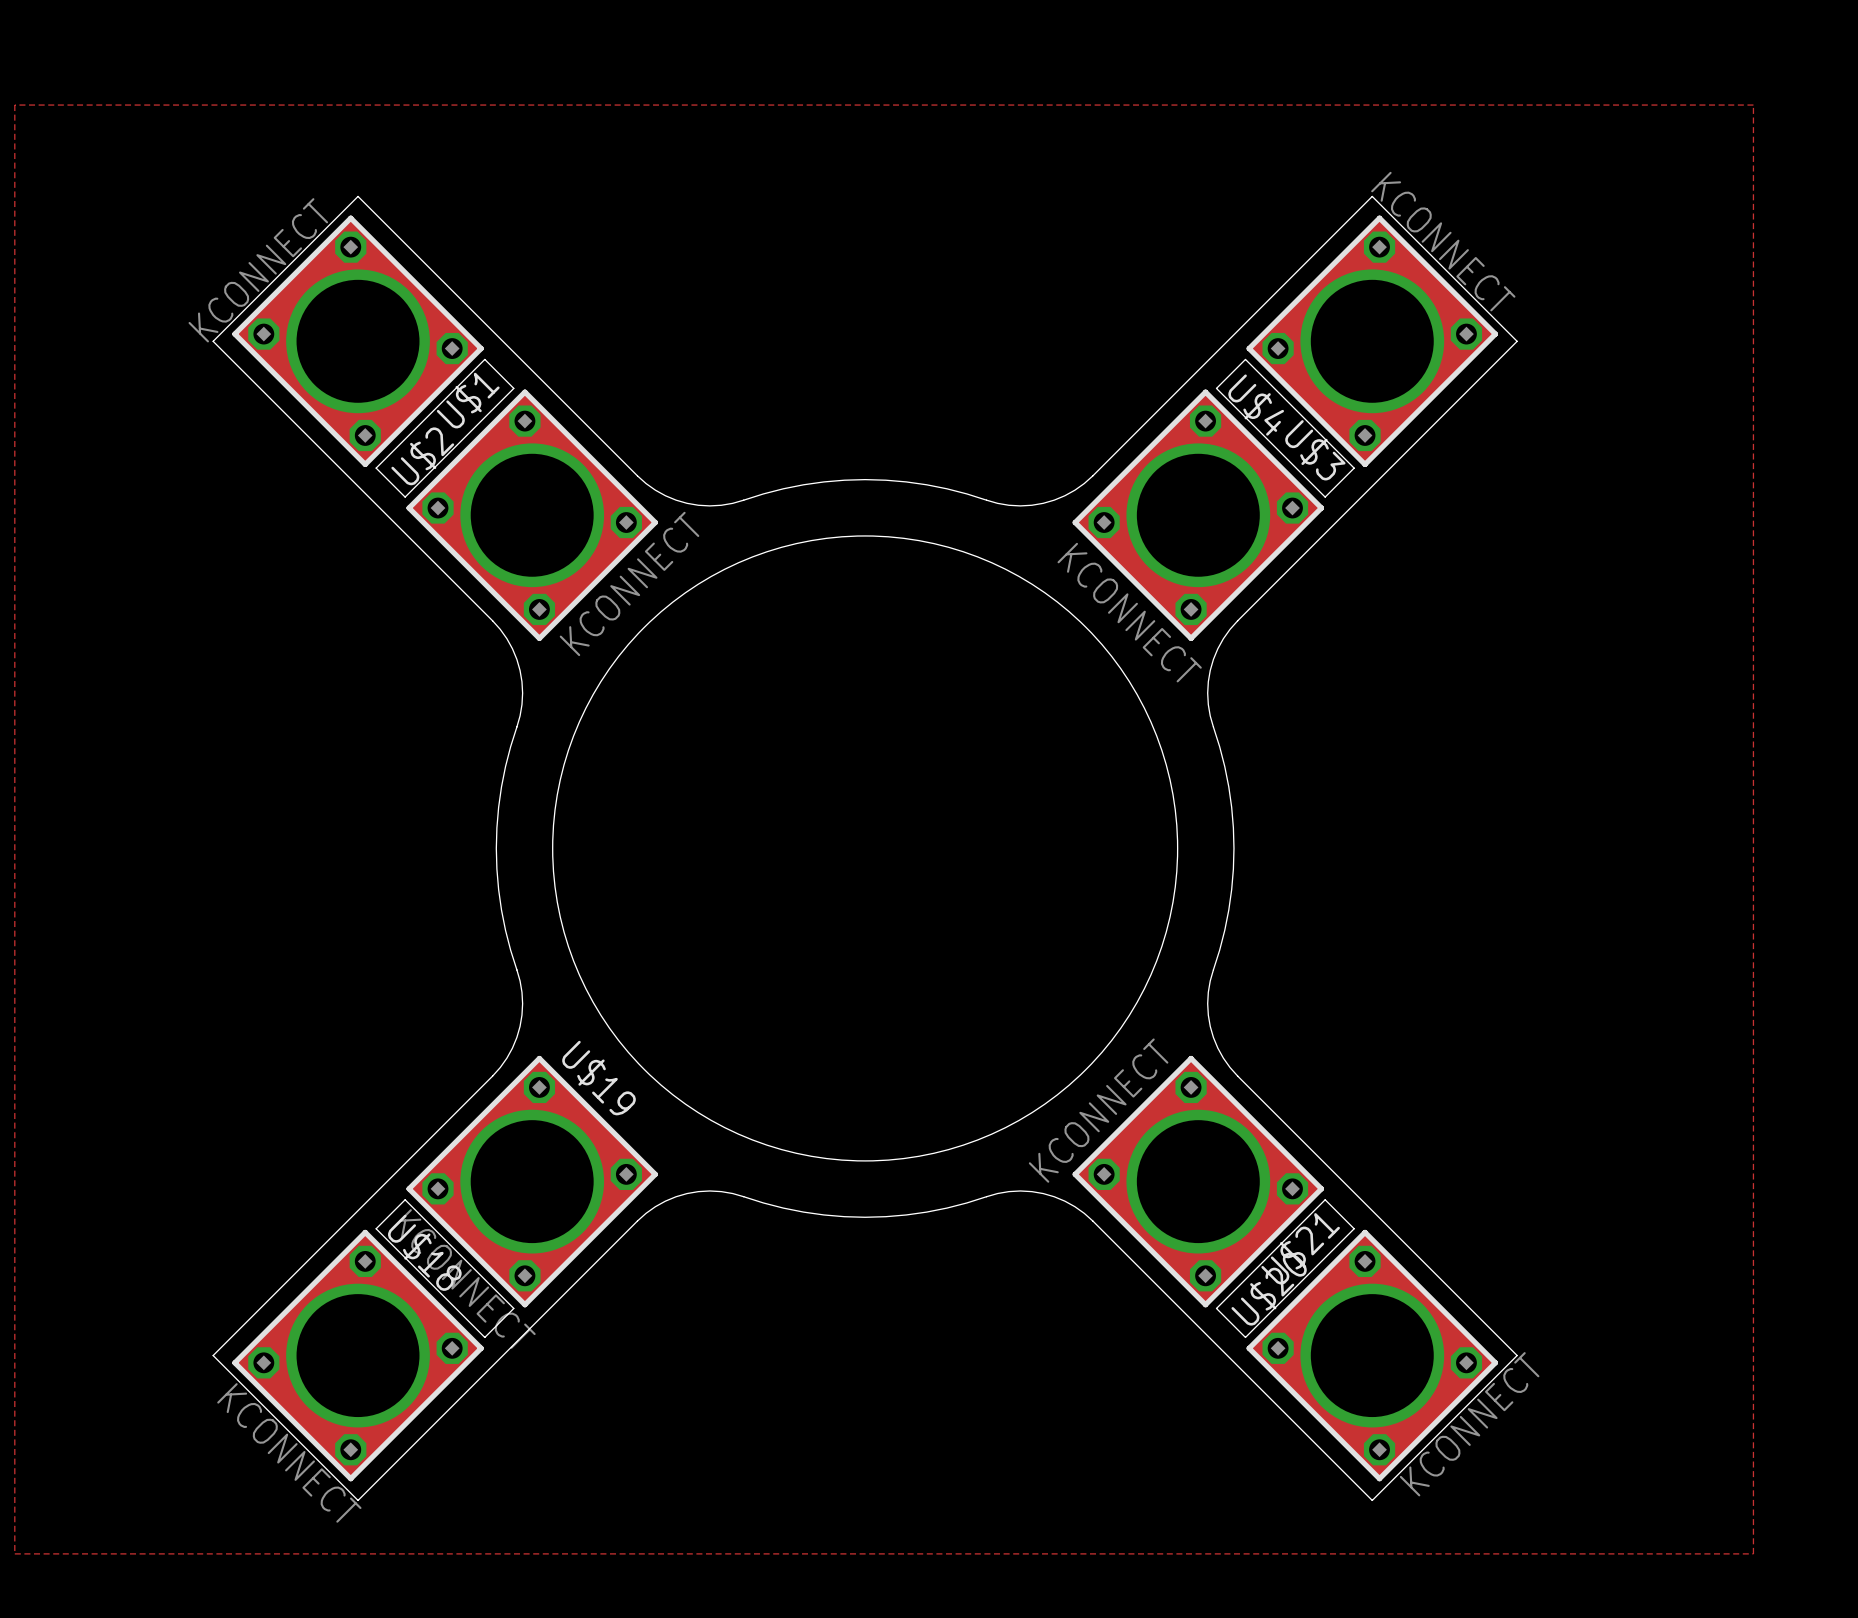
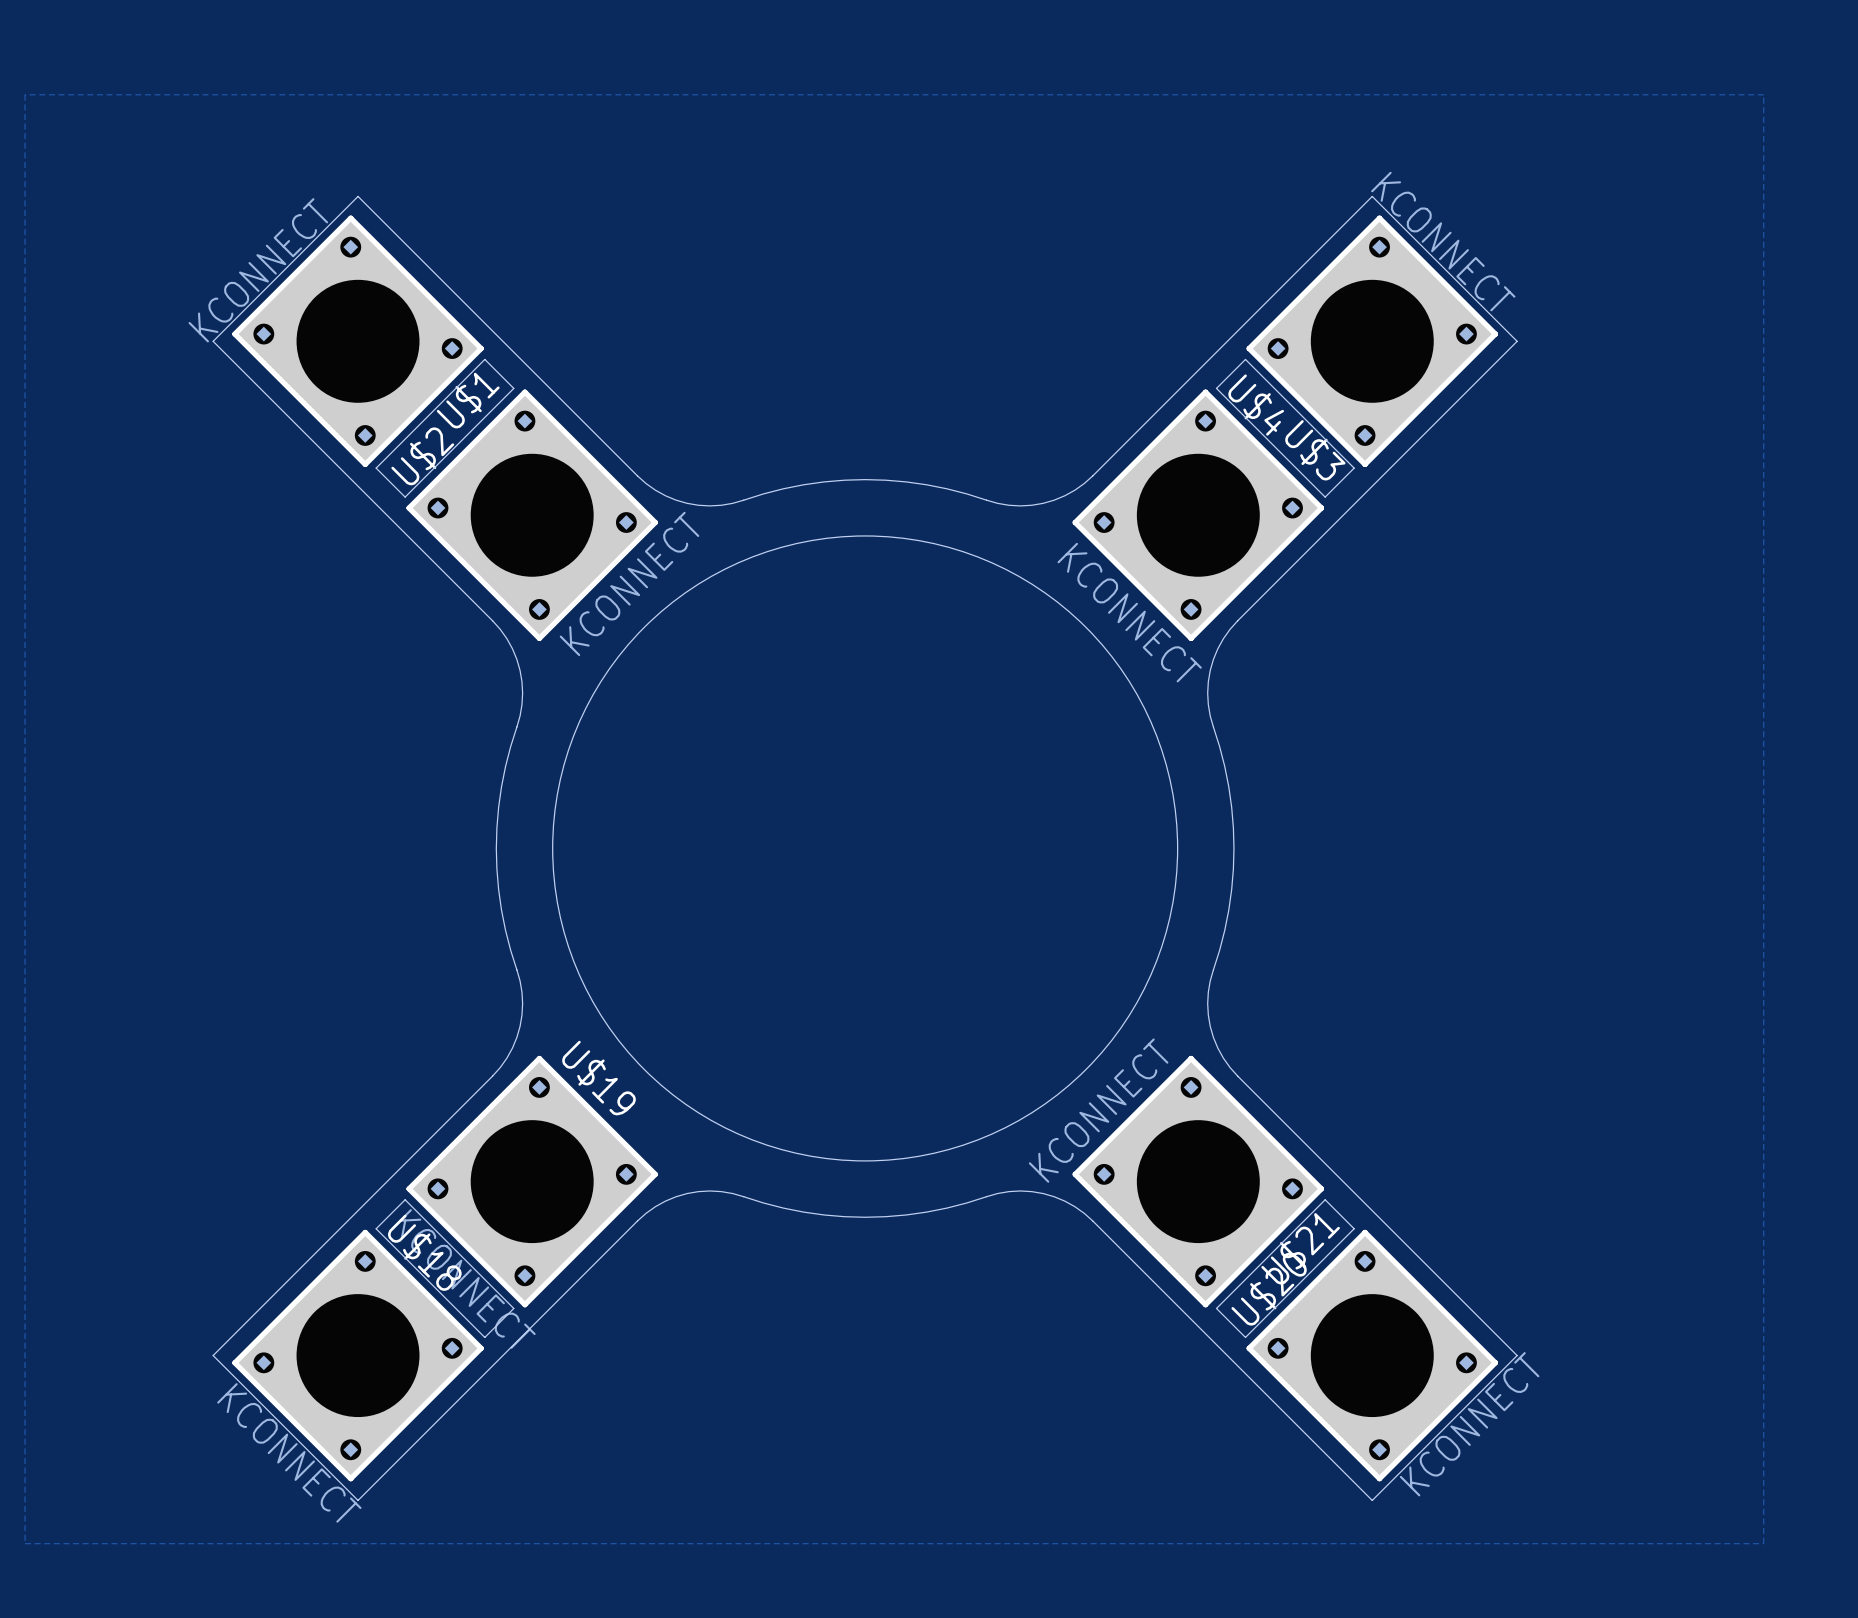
zone outline: (14, 105) (14, 1553) (1753, 1553) (1753, 105) (14, 105) -> (25, 94) (25, 1543) (1763, 1543) (1763, 94) (25, 94)

